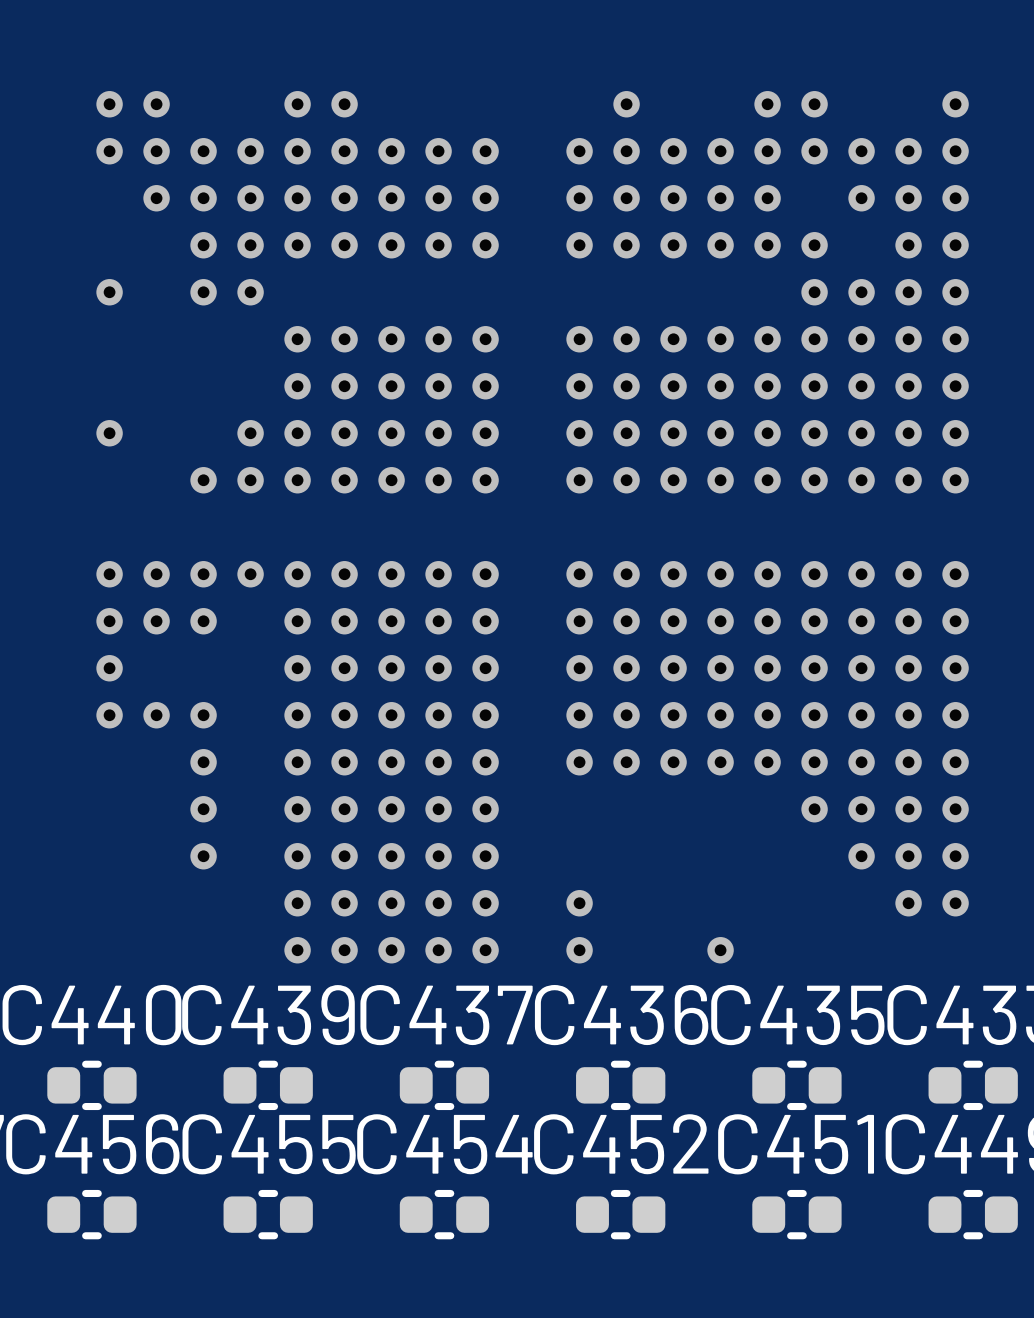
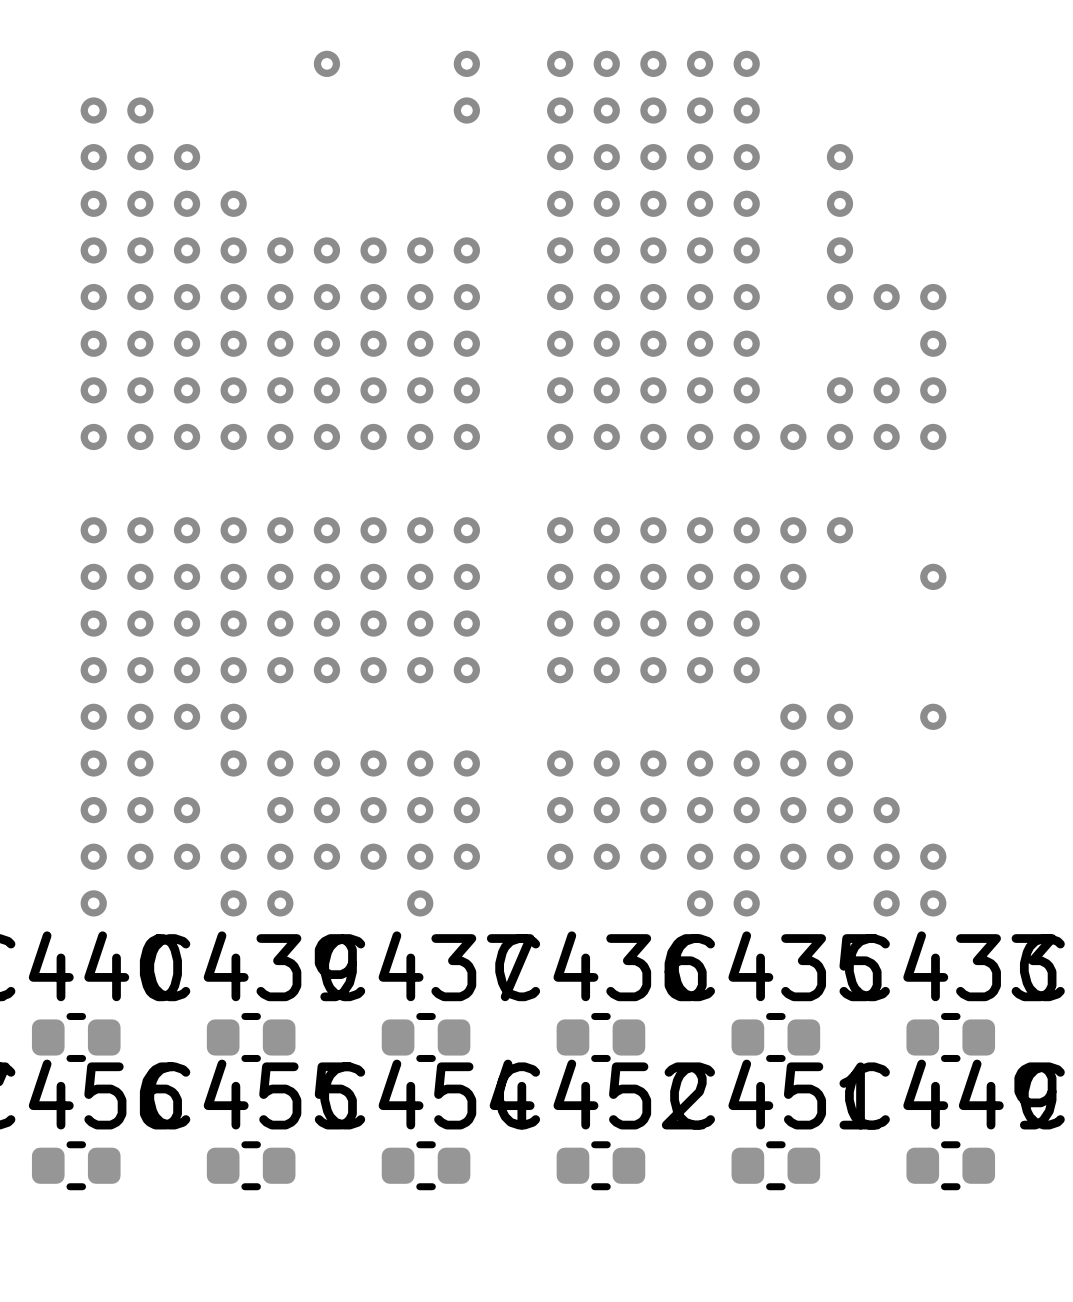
via: (109, 104) -> none
via: (156, 104) -> none
via: (297, 104) -> none
via: none -> (466, 63)
via: none -> (560, 63)
via: none -> (653, 63)
via: none -> (700, 63)
via: (814, 104) -> none
via: (955, 104) -> none
via: (203, 151) -> none
via: (250, 151) -> none
via: (297, 151) -> none
via: (344, 151) -> none
via: (391, 151) -> none
via: (438, 151) -> none
via: (814, 151) -> none
via: (861, 151) -> none
via: (908, 151) -> none
via: (955, 151) -> none
via: none -> (93, 157)
via: (250, 198) -> none
via: (297, 198) -> none
via: (344, 198) -> none
via: (391, 198) -> none
via: (438, 198) -> none
via: (485, 198) -> none
via: (908, 198) -> none
via: (955, 198) -> none
via: none -> (93, 203)
via: none -> (140, 203)
via: (297, 245) -> none
via: (344, 245) -> none
via: (391, 245) -> none
via: (438, 245) -> none
via: (485, 245) -> none
via: (814, 245) -> none
via: none -> (839, 203)
via: (908, 245) -> none
via: (955, 245) -> none
via: none -> (140, 250)
via: none -> (280, 250)
via: none -> (326, 250)
via: none -> (373, 250)
via: none -> (420, 250)
via: none -> (466, 250)
via: none -> (560, 250)
via: none -> (606, 250)
via: none -> (653, 250)
via: none -> (700, 250)
via: none -> (746, 250)
via: (814, 292) -> none
via: (908, 292) -> none
via: (955, 292) -> none
via: none -> (93, 297)
via: none -> (140, 297)
via: none -> (187, 297)
via: none -> (233, 297)
via: (814, 339) -> none
via: none -> (93, 343)
via: none -> (140, 343)
via: none -> (187, 343)
via: none -> (233, 343)
via: (814, 386) -> none
via: (861, 386) -> none
via: (908, 386) -> none
via: none -> (140, 390)
via: none -> (187, 390)
via: (814, 433) -> none
via: none -> (93, 436)
via: none -> (140, 436)
via: (908, 574) -> none
via: (955, 574) -> none
via: none -> (233, 576)
via: (861, 621) -> none
via: (908, 621) -> none
via: none -> (140, 623)
via: none -> (187, 623)
via: none -> (233, 623)
via: (814, 668) -> none
via: (861, 668) -> none
via: (908, 668) -> none
via: (955, 668) -> none
via: none -> (233, 670)
via: (814, 715) -> none
via: (861, 715) -> none
via: (908, 715) -> none
via: (955, 715) -> none
via: none -> (93, 716)
via: none -> (140, 716)
via: none -> (233, 716)
via: (297, 762) -> none
via: (344, 762) -> none
via: (391, 762) -> none
via: (438, 762) -> none
via: (485, 762) -> none
via: (579, 762) -> none
via: (626, 762) -> none
via: (673, 762) -> none
via: (720, 762) -> none
via: (767, 762) -> none
via: (908, 762) -> none
via: none -> (93, 763)
via: none -> (140, 763)
via: (203, 809) -> none
via: none -> (233, 763)
via: none -> (560, 763)
via: none -> (606, 763)
via: none -> (653, 763)
via: none -> (700, 763)
via: none -> (746, 763)
via: (908, 809) -> none
via: (955, 809) -> none
via: none -> (93, 810)
via: none -> (140, 810)
via: none -> (560, 810)
via: none -> (606, 810)
via: none -> (653, 810)
via: none -> (700, 810)
via: none -> (746, 810)
via: none -> (793, 810)
via: (955, 856) -> none
via: none -> (93, 856)
via: none -> (140, 856)
via: none -> (187, 856)
via: none -> (233, 856)
via: none -> (606, 856)
via: none -> (653, 856)
via: none -> (700, 856)
via: none -> (746, 856)
via: none -> (793, 856)
via: none -> (839, 856)
via: none -> (93, 903)
via: none -> (233, 903)
via: (344, 950) -> none
via: (391, 950) -> none
via: (485, 950) -> none
via: (579, 950) -> none
via: none -> (746, 903)
via: none -> (886, 903)
via: none -> (933, 903)

